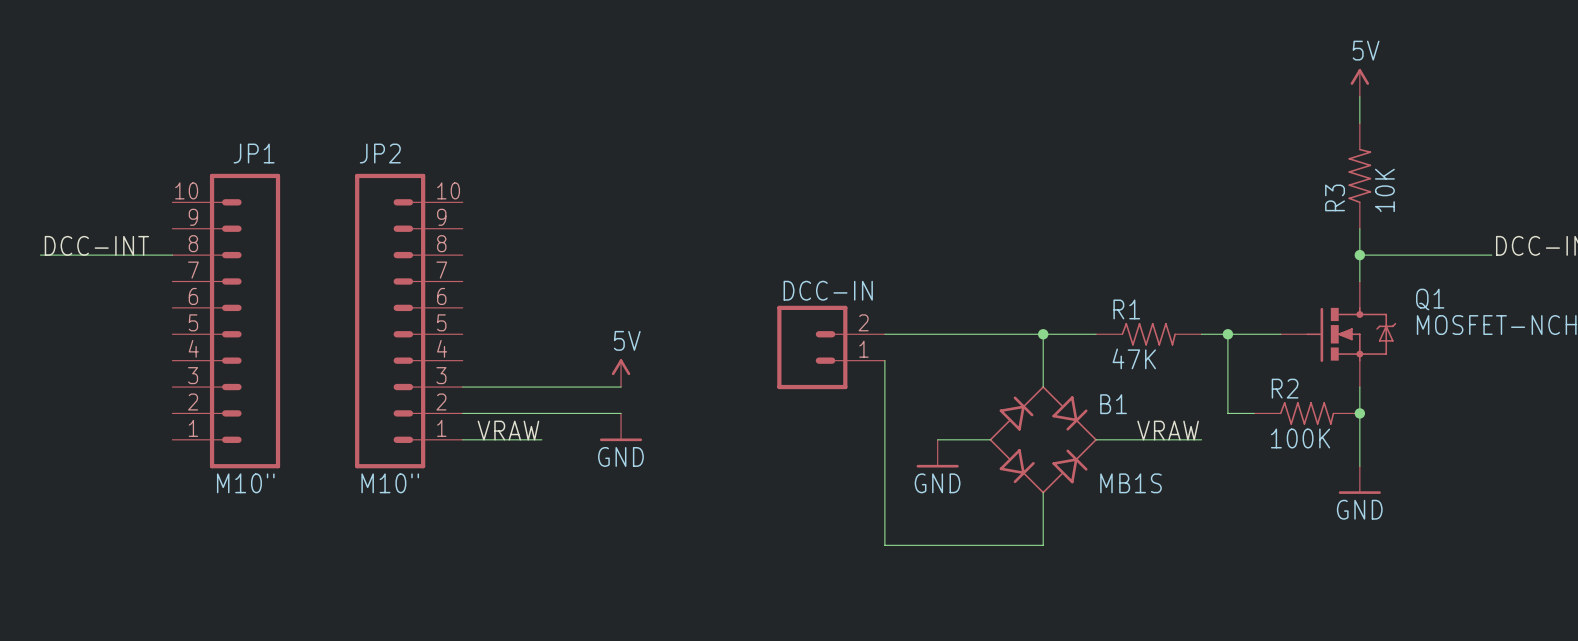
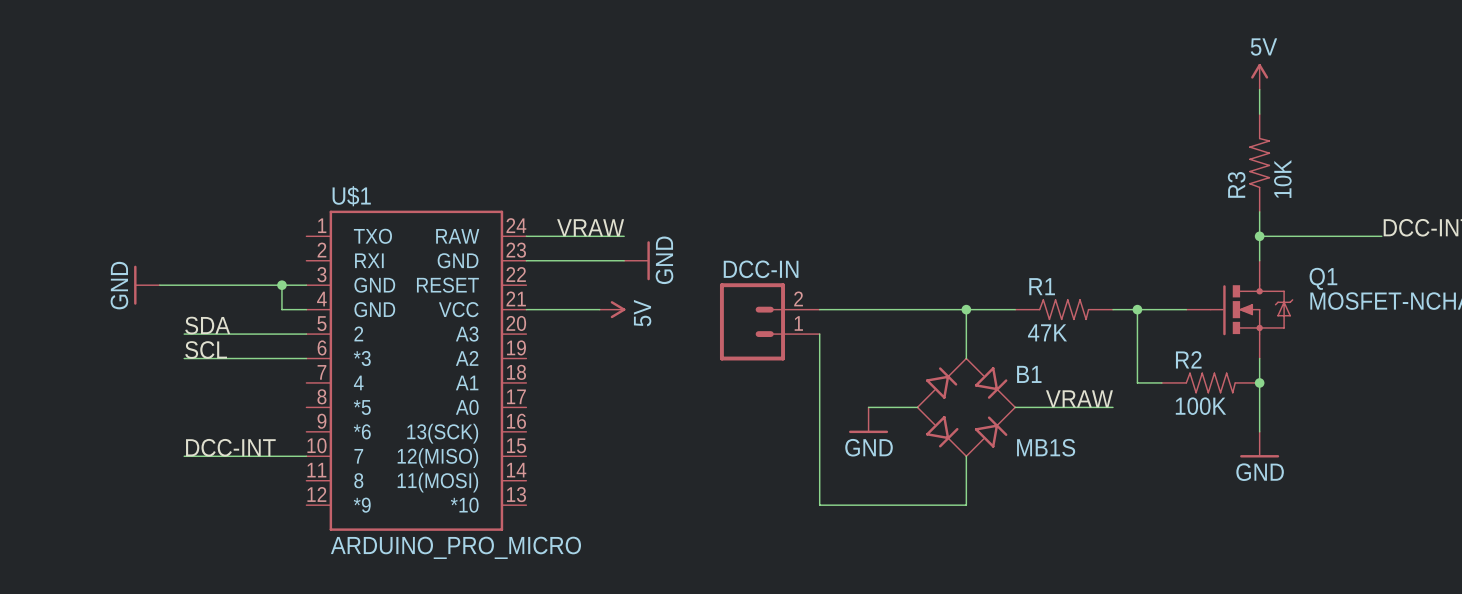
label: DCC-INT (96, 245) -> none
wire: (40, 255) (172, 255) -> (184, 334) (306, 334)
wire: none -> (526, 236) (624, 236)
wire: none -> (526, 260) (624, 260)
power symbol: none -> GND (146, 285)
wire: none -> (159, 285) (306, 285)
wire: none -> (281, 285) (281, 309) (306, 309)
junction: none -> (281, 285)
JP1: M10" (226, 321) -> none
JP2: M10" (408, 321) -> none
label: none -> SDA (207, 325)
power symbol rotation: 0° (621, 367) -> 90° clockwise (618, 309)
power symbol position: 5V (621, 373) -> 5V (612, 309)
label: none -> SCL (206, 349)
wire: none -> (184, 358) (306, 358)
wire: (462, 387) (621, 387) -> none
U$1: none -> ARDUINO_PRO_MICRO (416, 370)
wire: (462, 413) (621, 413) -> none
power symbol position: GND (621, 427) -> GND (636, 260)
label position: VRAW (508, 430) -> VRAW (590, 227)
wire: (462, 439) (541, 439) -> (526, 309) (599, 309)
power symbol rotation: 0° (621, 439) -> 90° counterclockwise (648, 260)
label: none -> DCC-INT (230, 447)
wire: none -> (184, 456) (306, 456)

